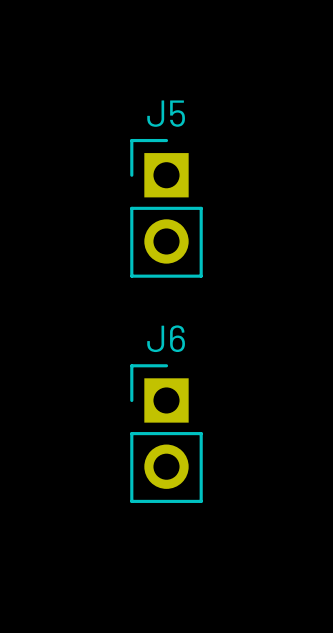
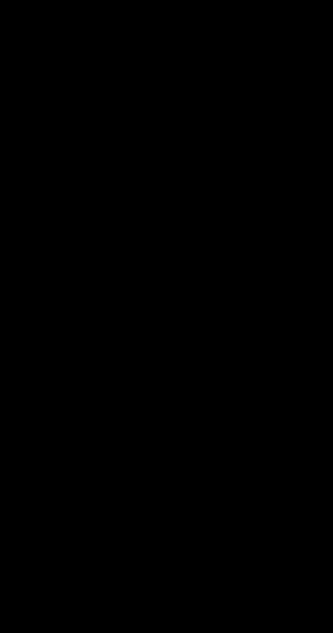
J5: (166, 208) -> none
J6: (166, 433) -> none

